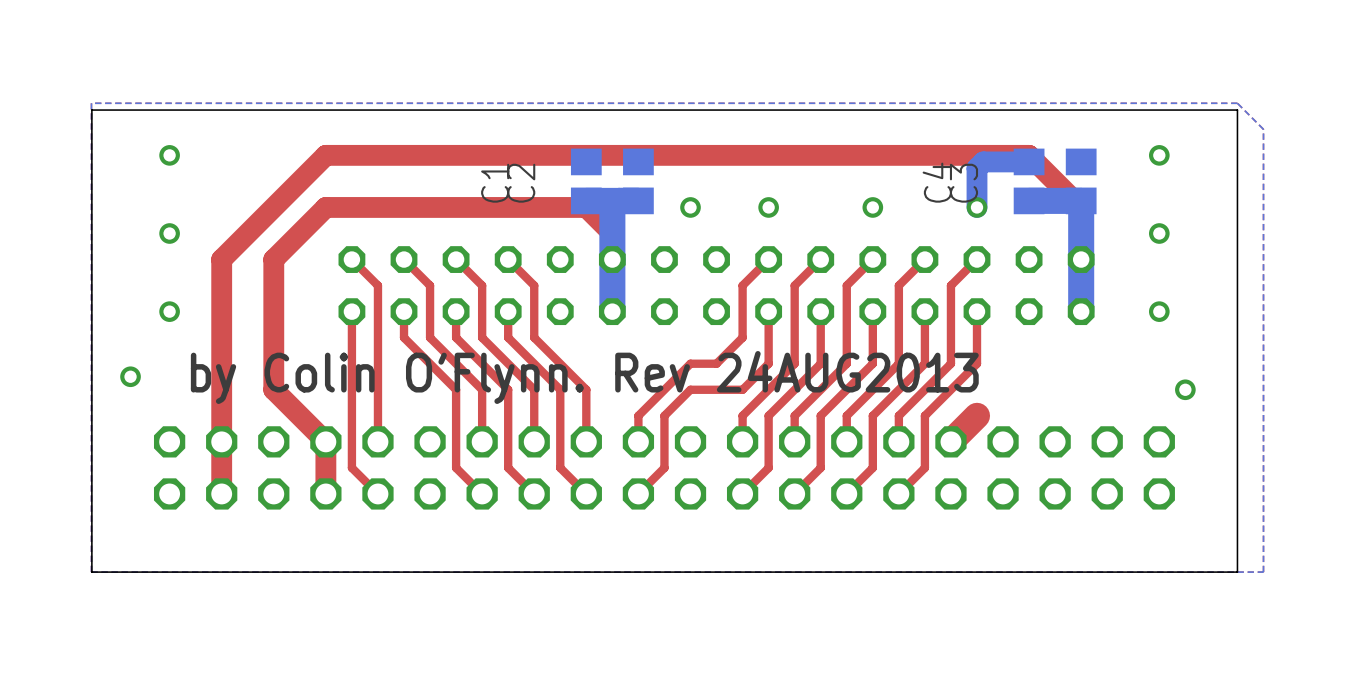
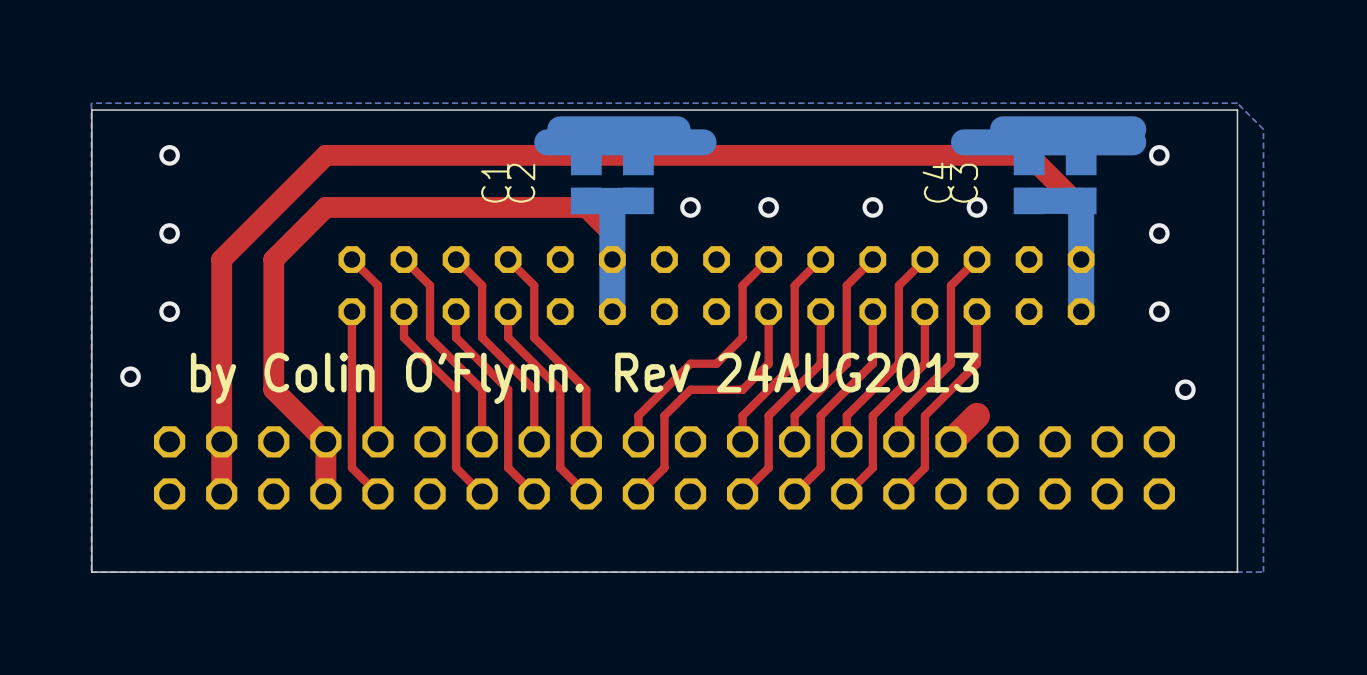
bottom track: none -> (677, 129) (560, 129)
bottom track: none -> (1133, 129) (1003, 129)
bottom track: none -> (703, 142) (547, 142)
bottom track: none -> (1133, 142) (963, 142)
bottom track: (1029, 161) (983, 161) (977, 168) (977, 207) -> none

